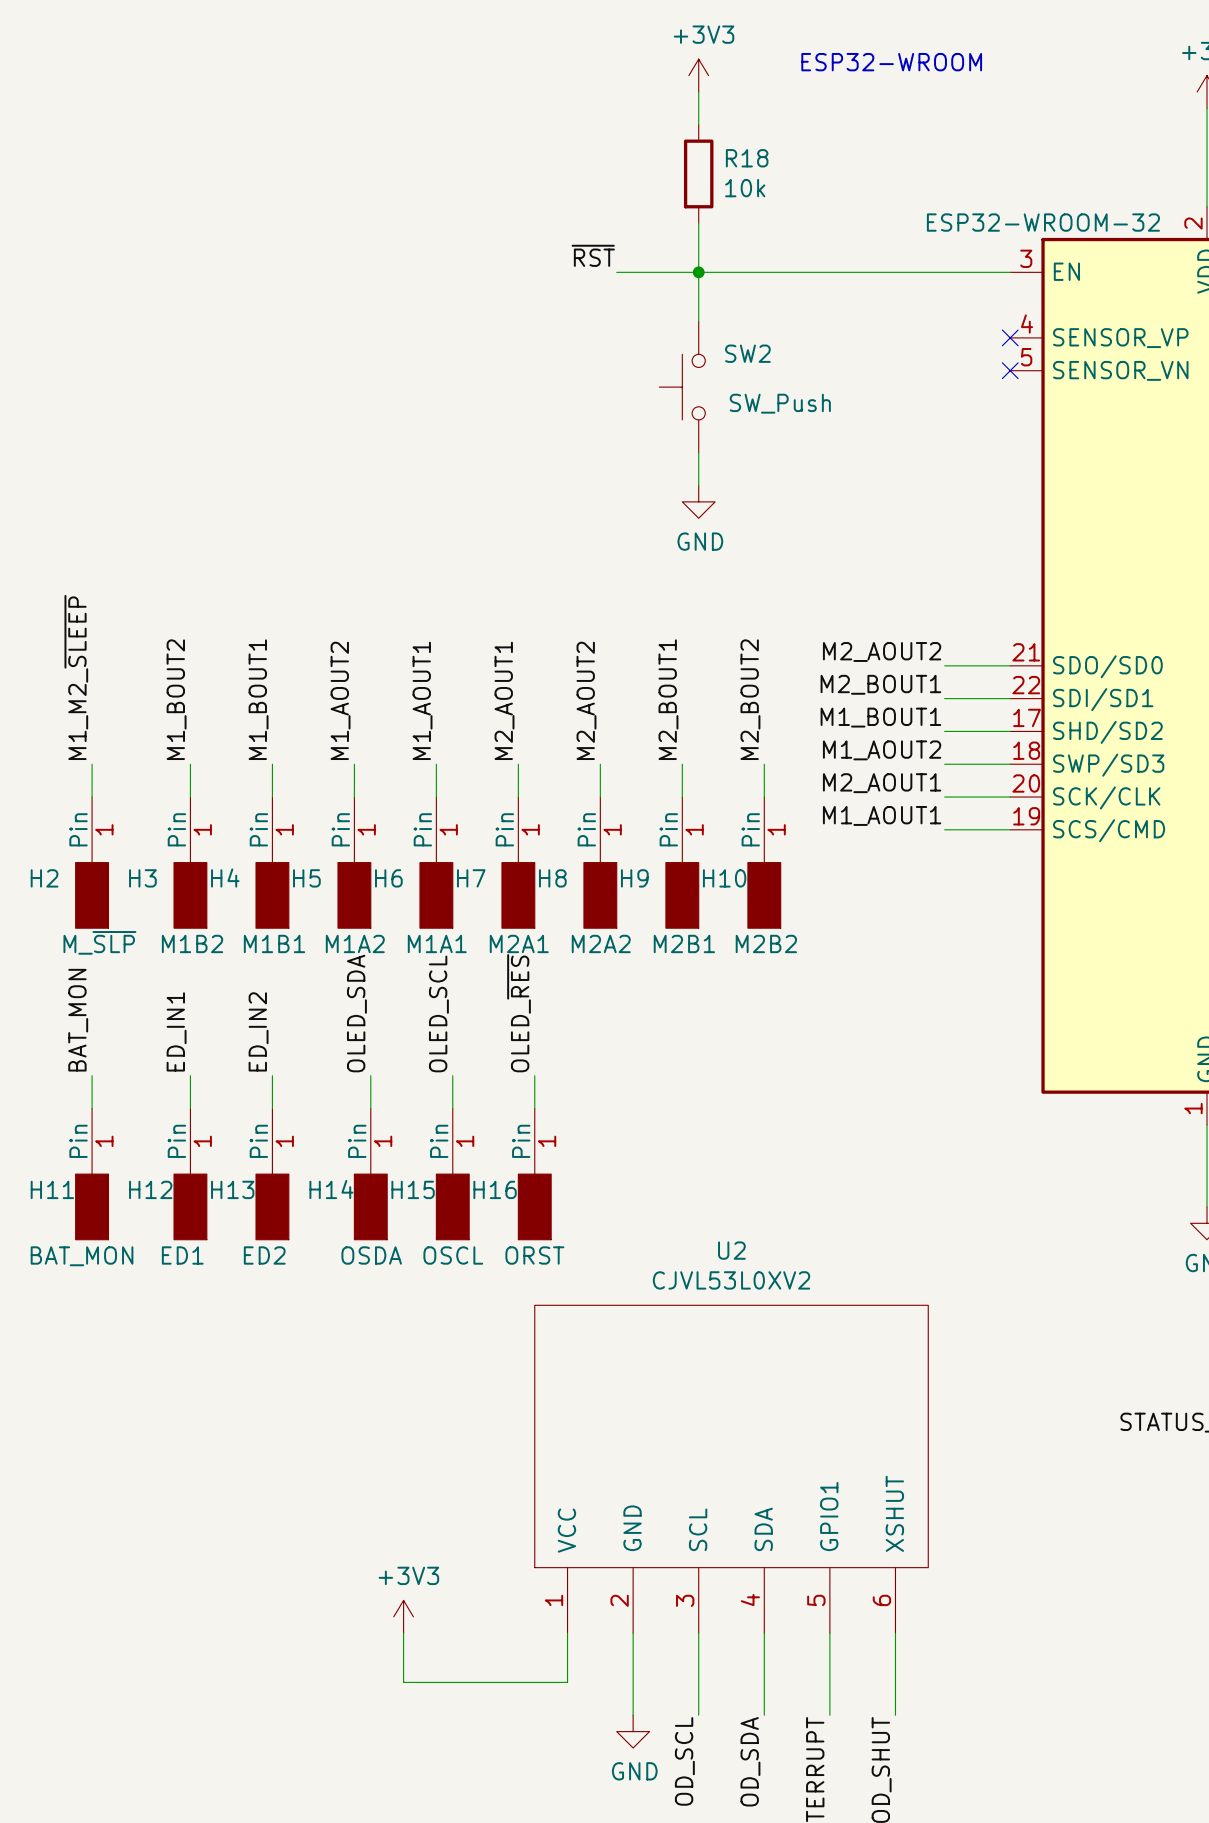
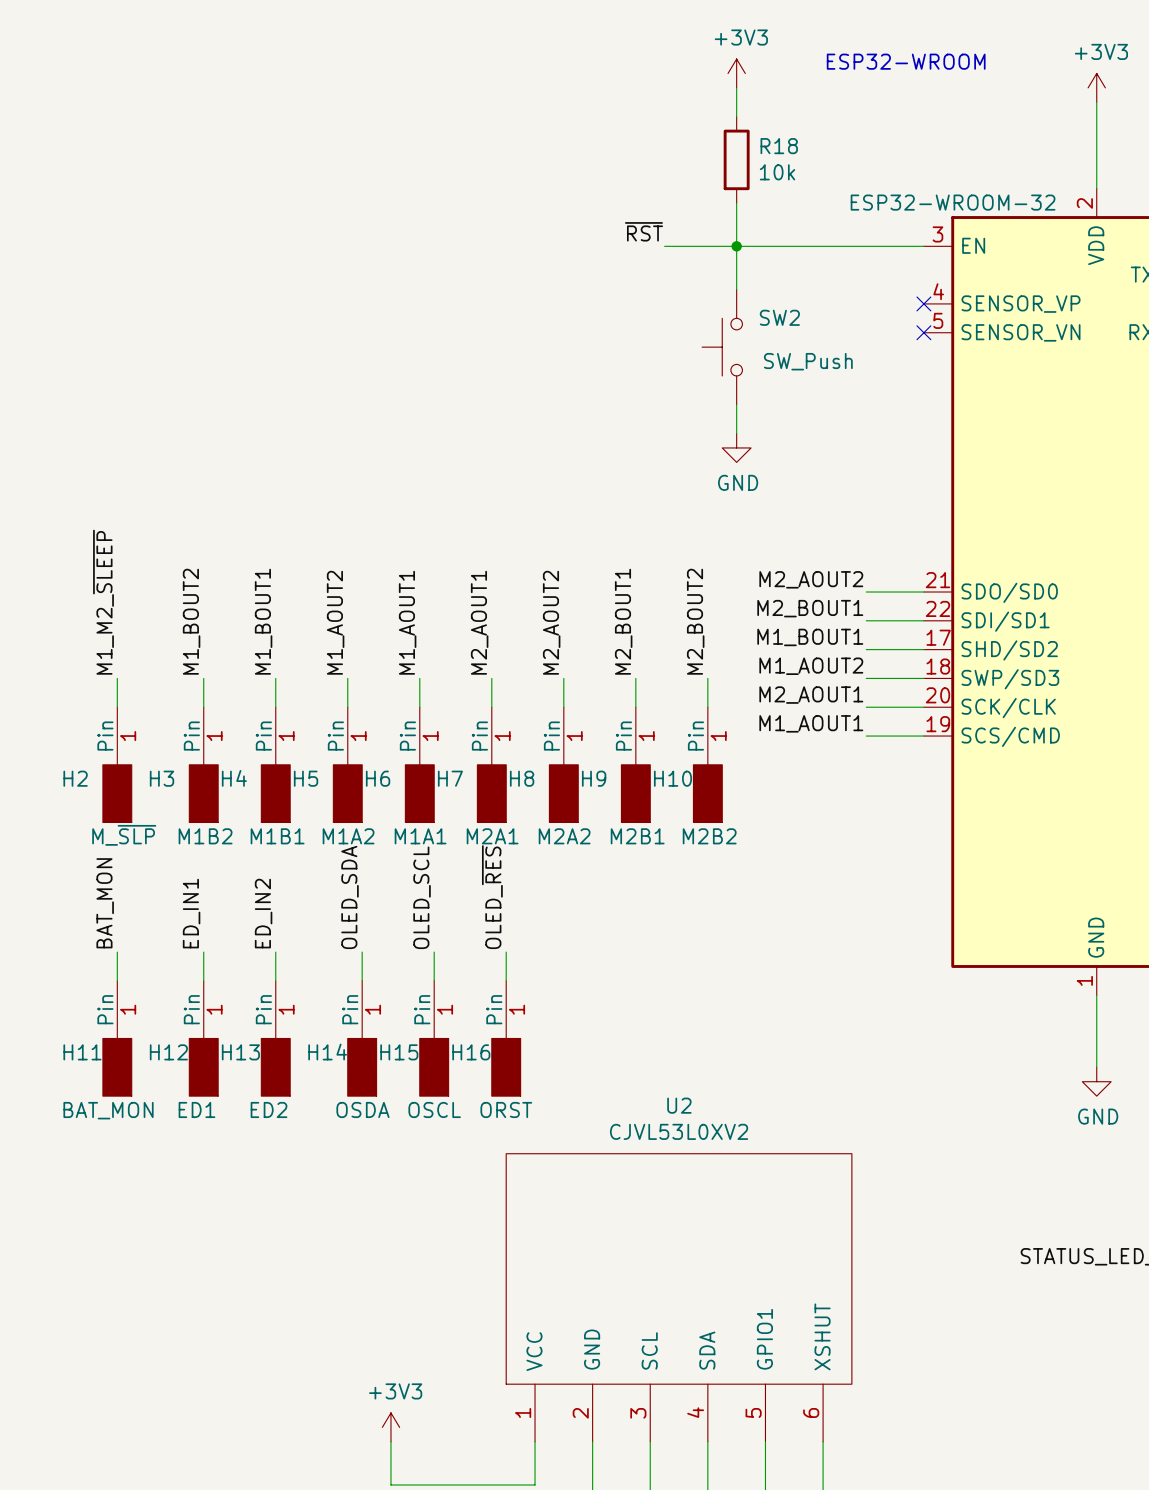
text position: ESP32-WROOM (891, 62) -> ESP32-WROOM (906, 61)
power symbol position: +3V3 (698, 75) -> +3V3 (736, 73)
wire: (698, 91) (698, 124) -> (736, 87) (736, 116)
R18 position: (698, 173) -> (736, 159)
wire: (698, 223) (698, 321) -> (736, 203) (736, 289)
label position: ~{RST} (593, 255) -> ~{RST} (643, 231)
wire: (616, 272) (715, 272) -> none
junction: (698, 272) -> none
junction: none -> (736, 246)
SW2 position: (682, 387) -> (722, 347)
wire: (698, 452) (698, 485) -> (736, 404) (736, 433)
power symbol position: GND (698, 501) -> GND (736, 447)

